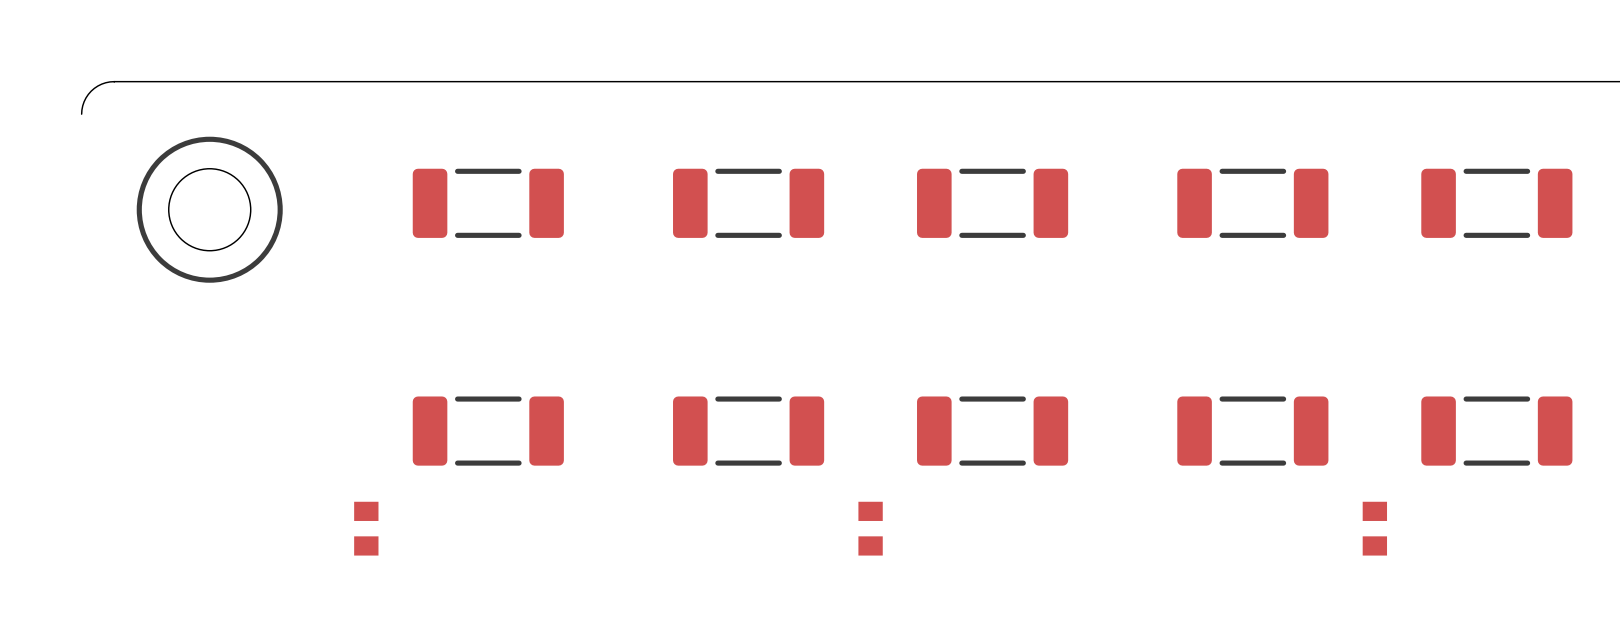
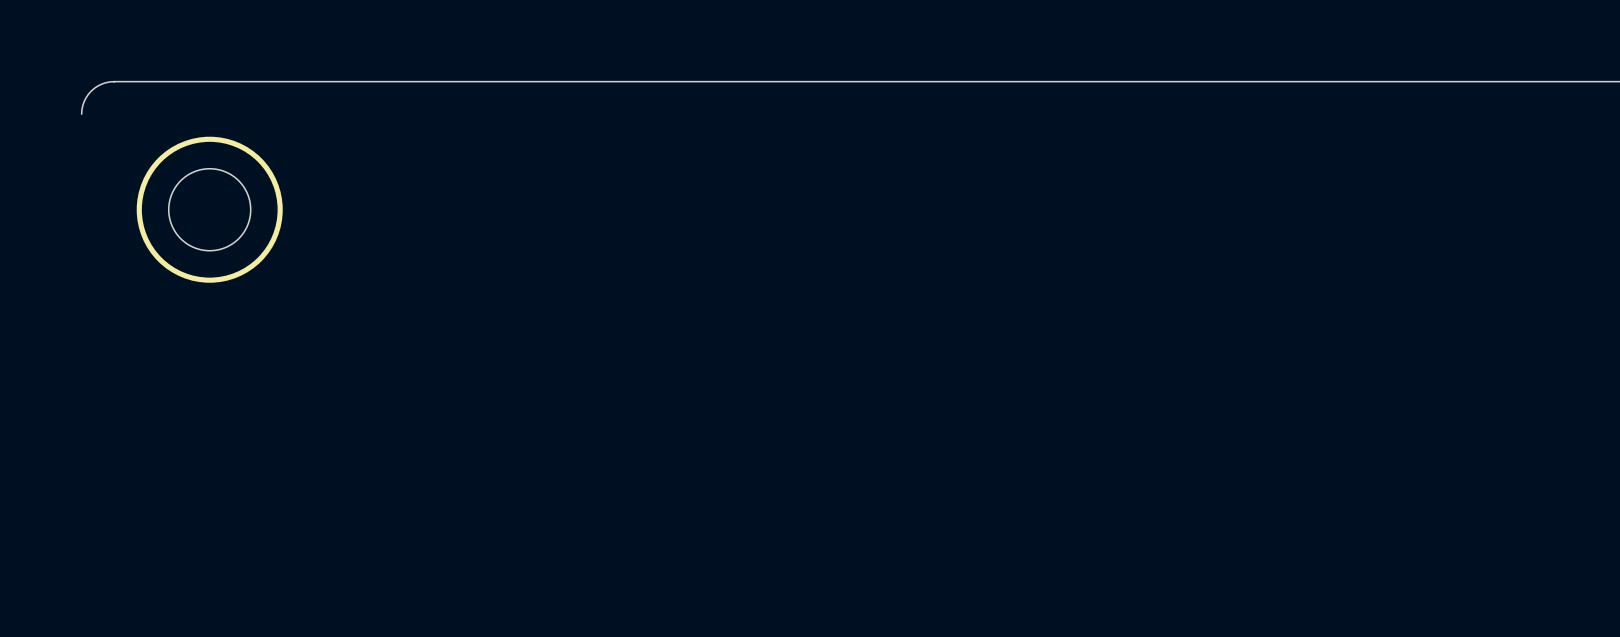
part: (488, 203) -> none
part: (748, 203) -> none
part: (992, 203) -> none
part: (1252, 203) -> none
part: (1496, 203) -> none
part: (488, 431) -> none
part: (748, 431) -> none
part: (992, 431) -> none
part: (1252, 431) -> none
part: (1496, 431) -> none
part: (366, 528) -> none
part: (870, 528) -> none
part: (1374, 528) -> none

